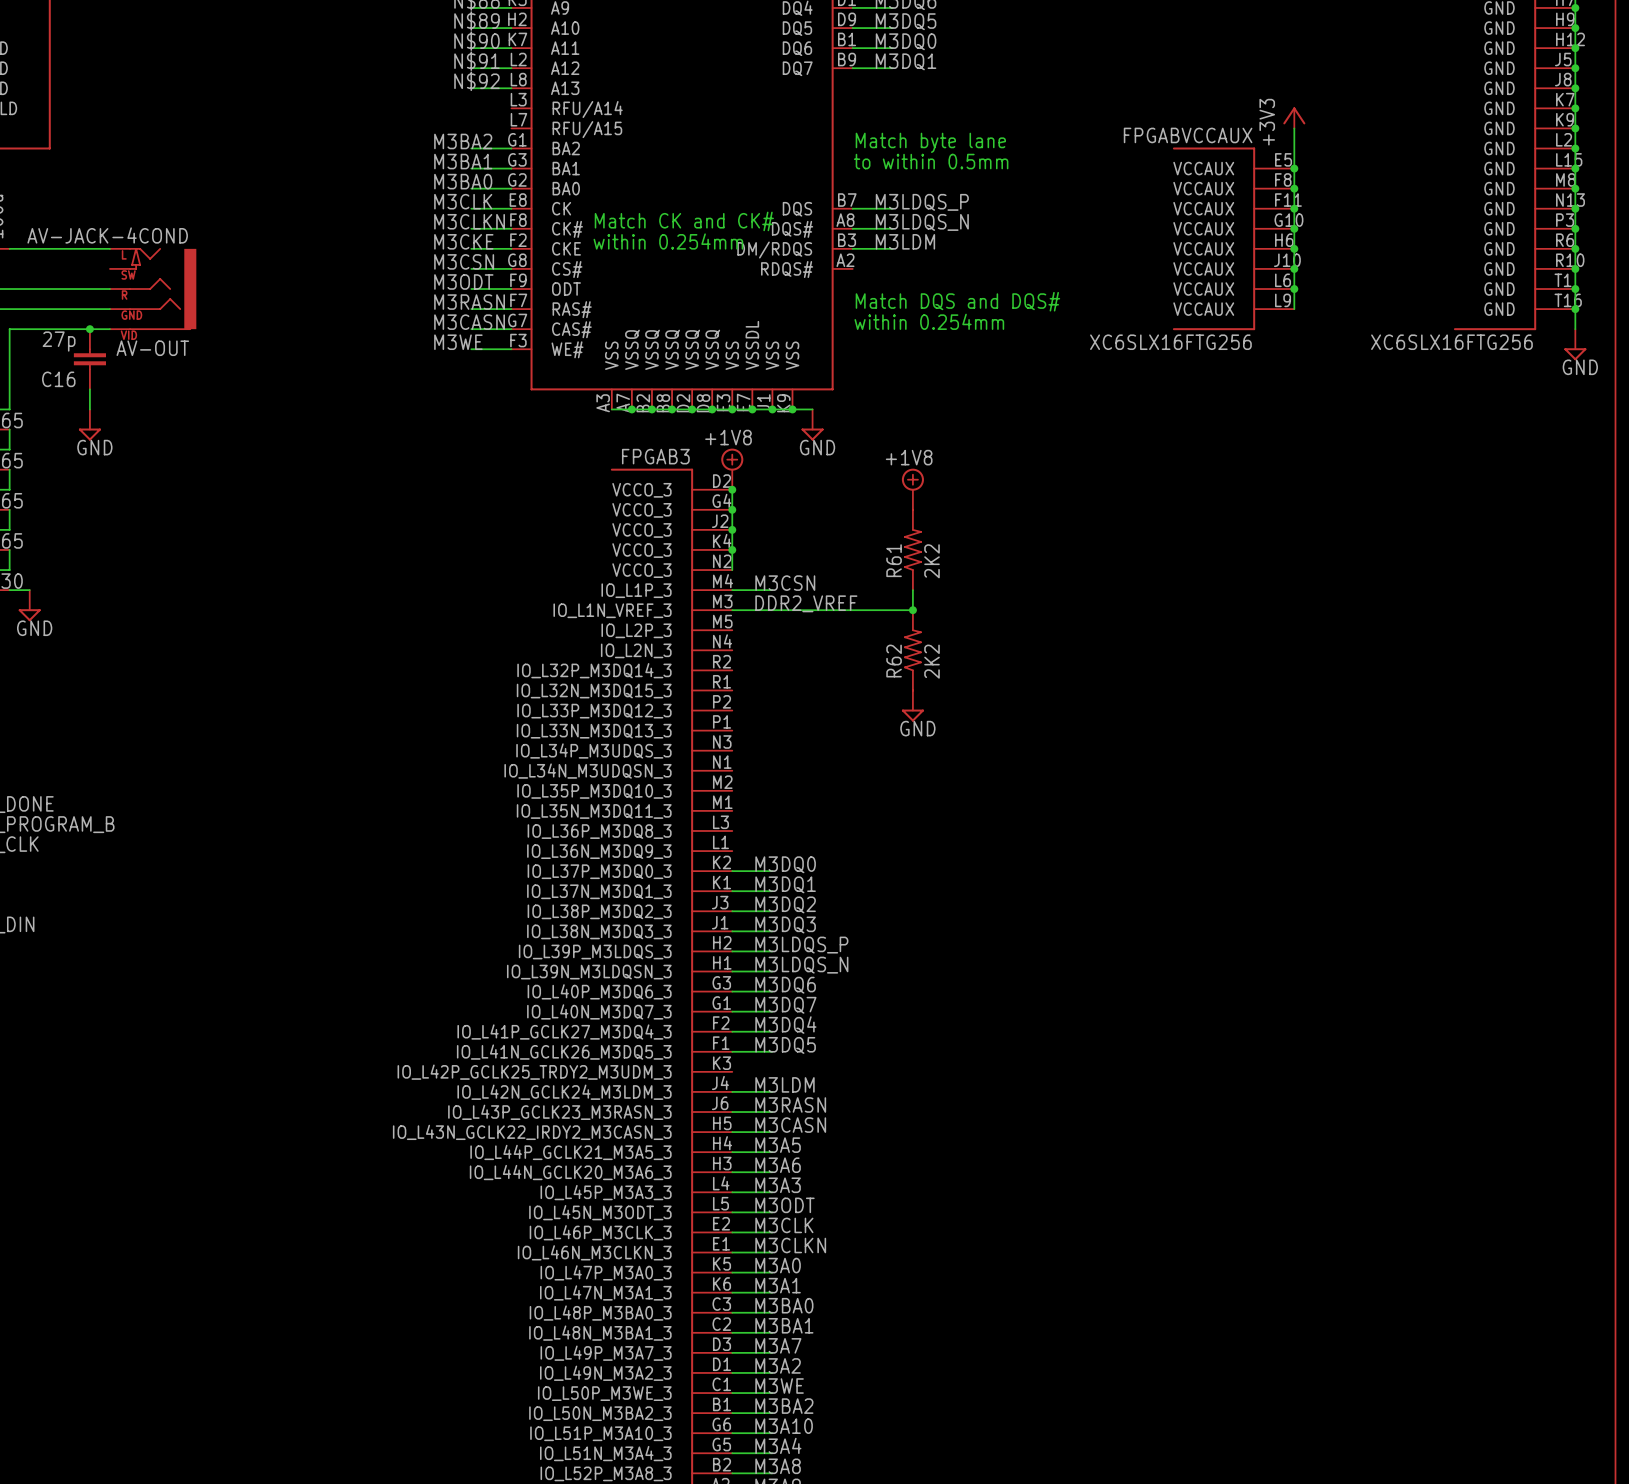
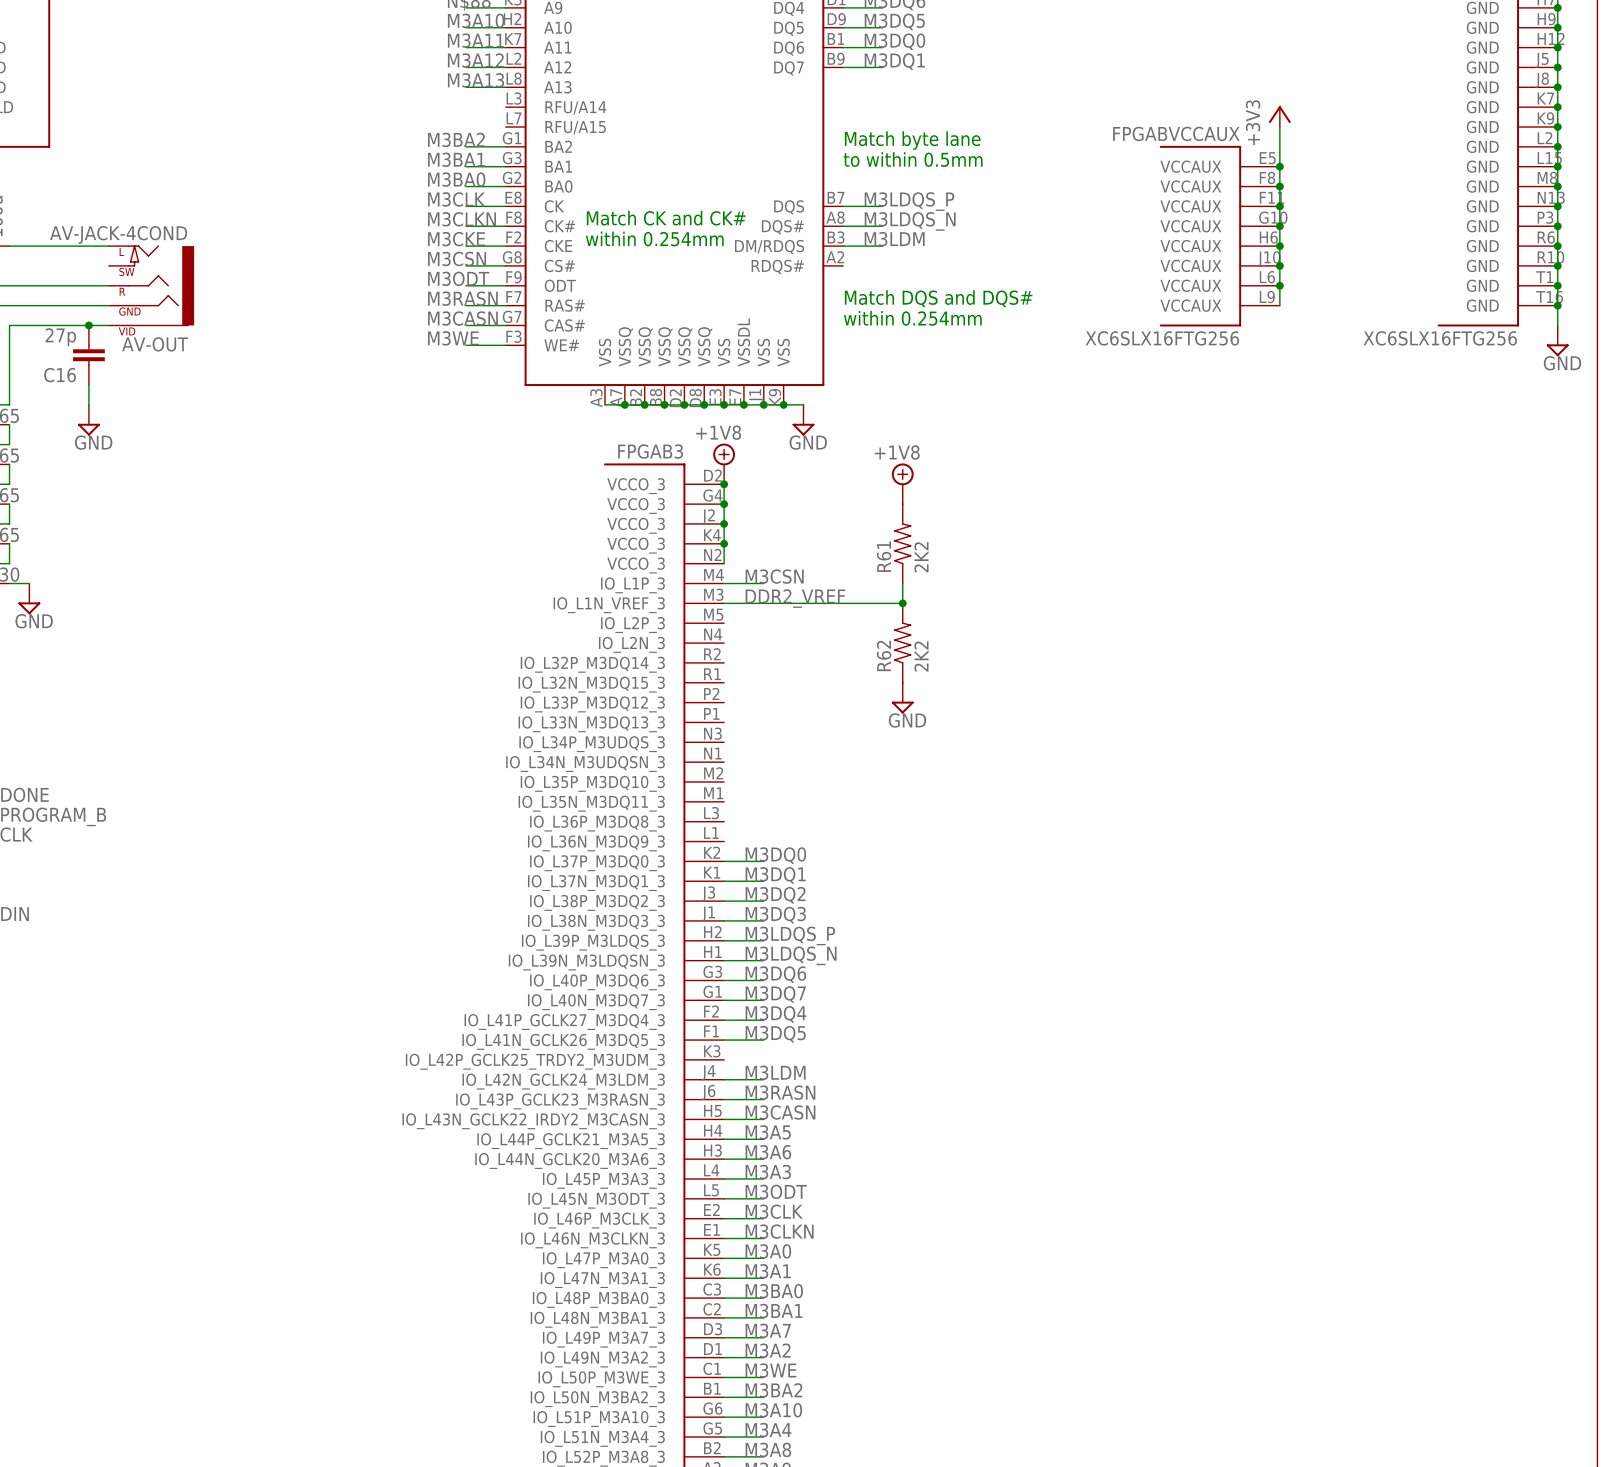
label: N$89 (476, 21) -> M3A10 (476, 20)
label: N$90 (476, 41) -> M3A11 (475, 40)
label: N$91 (476, 61) -> M3A12 (475, 60)
label: N$92 (476, 81) -> M3A13 (476, 80)

